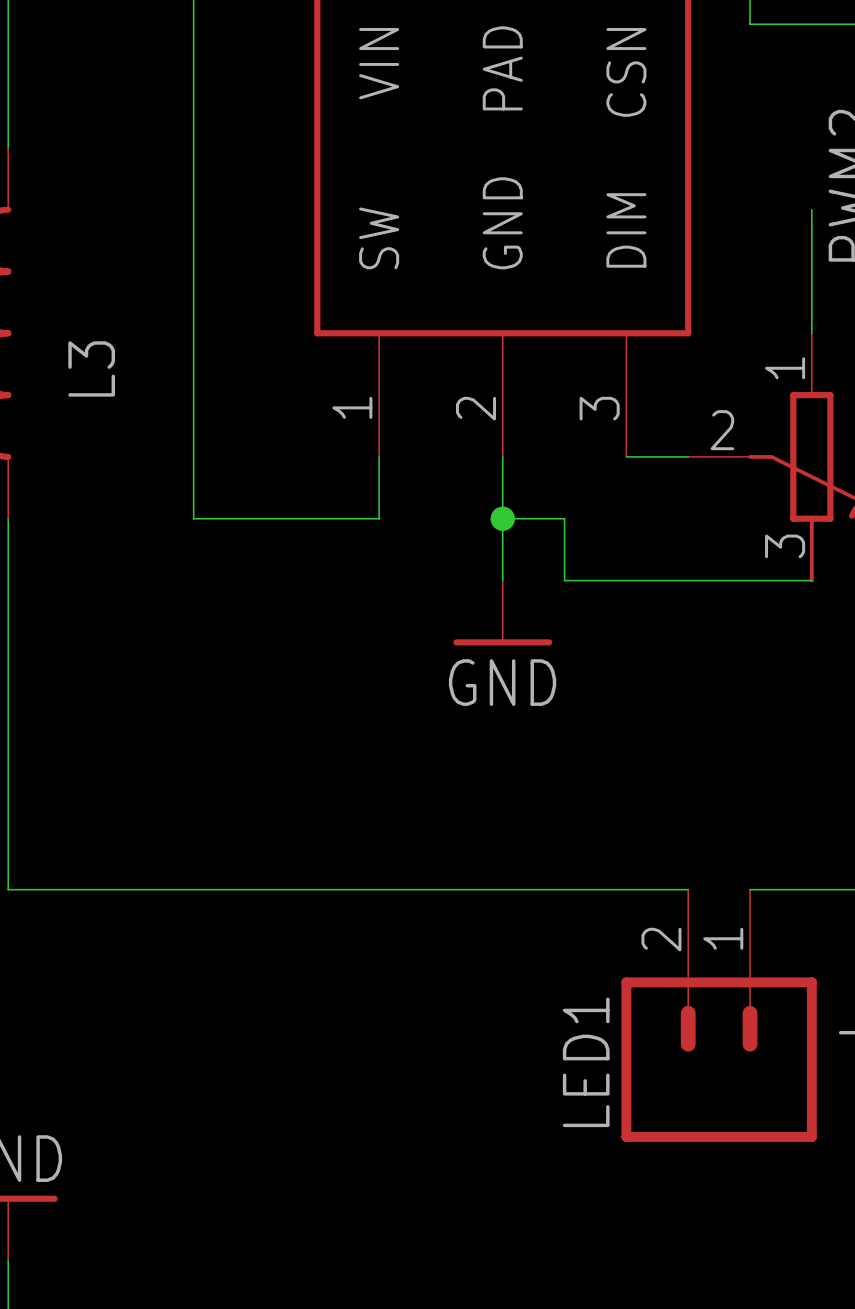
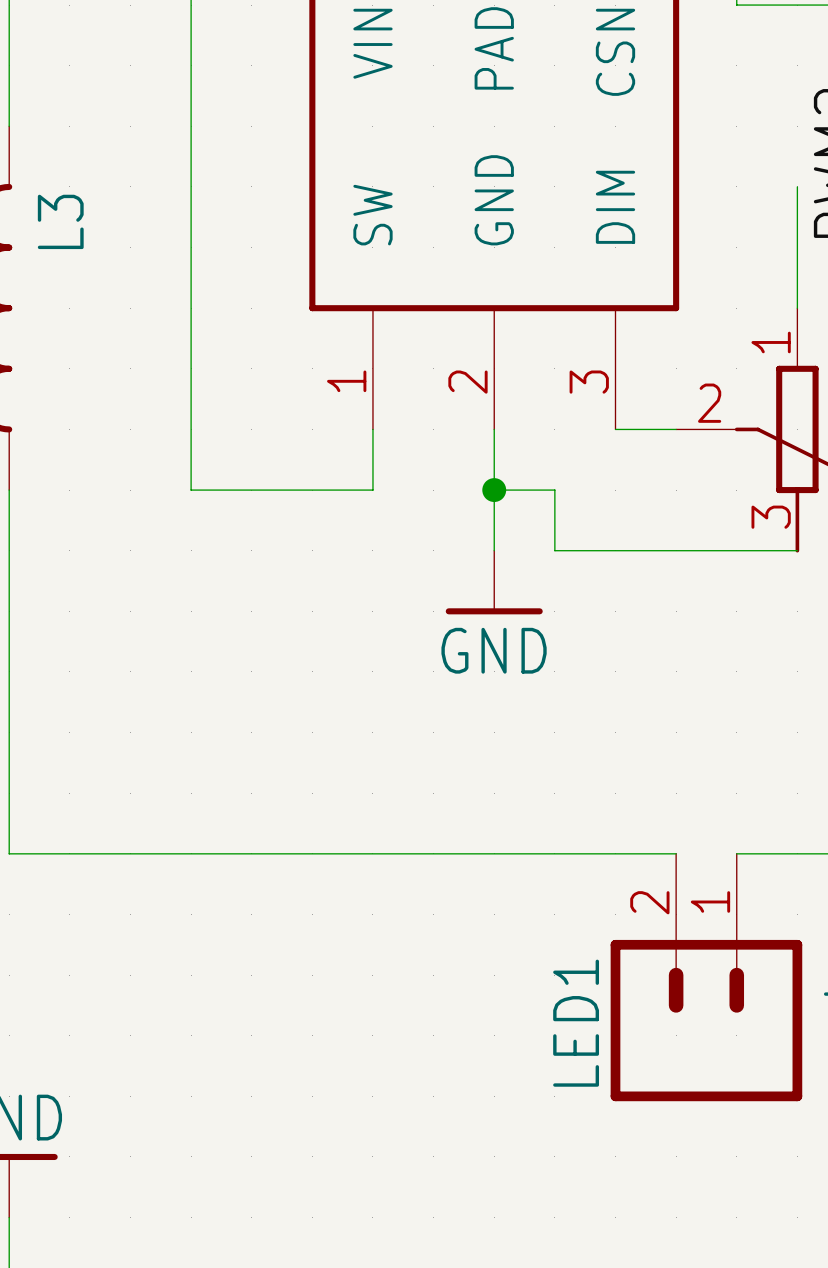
L3 name position: L3 (91, 368) -> L3 (60, 221)

